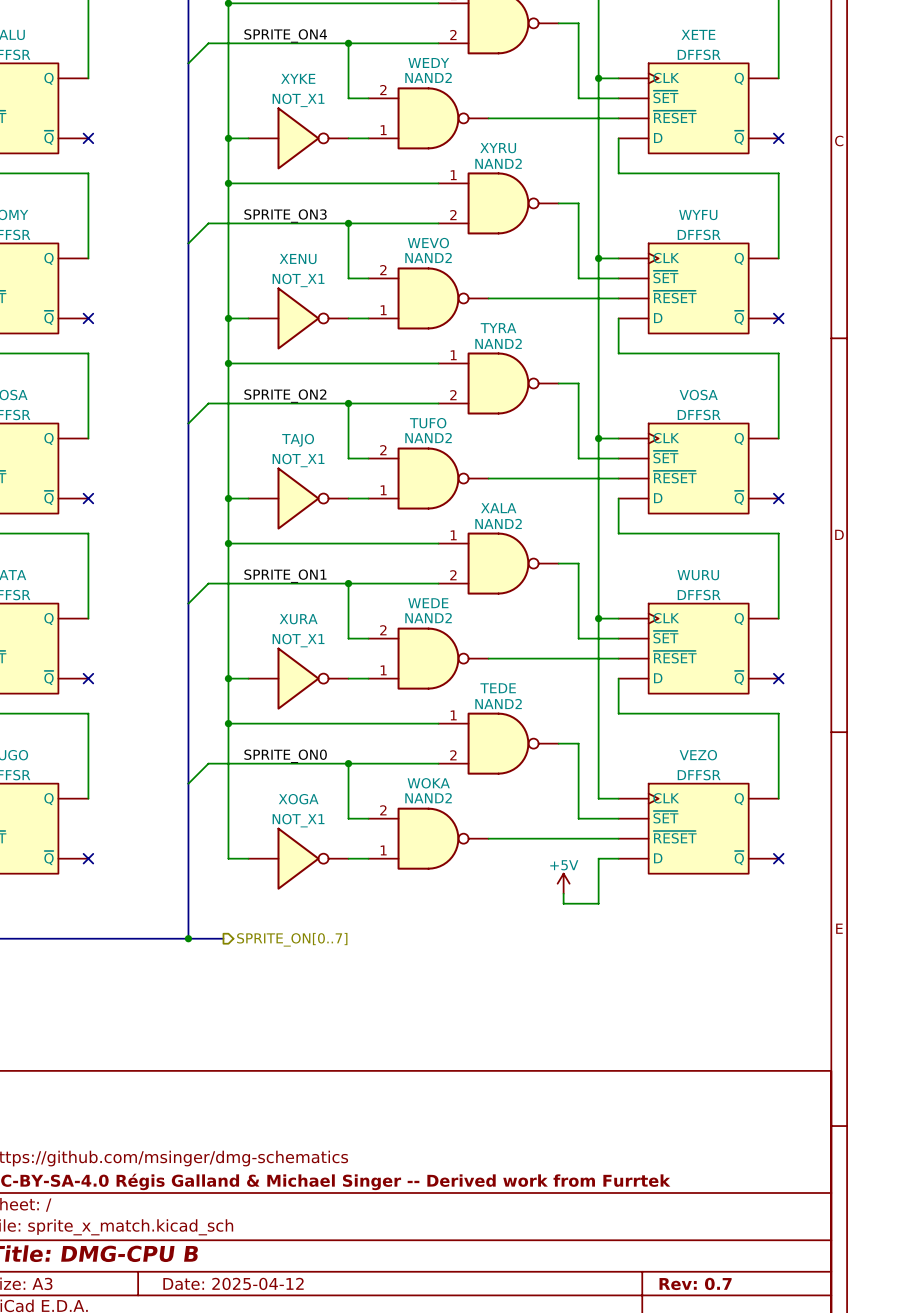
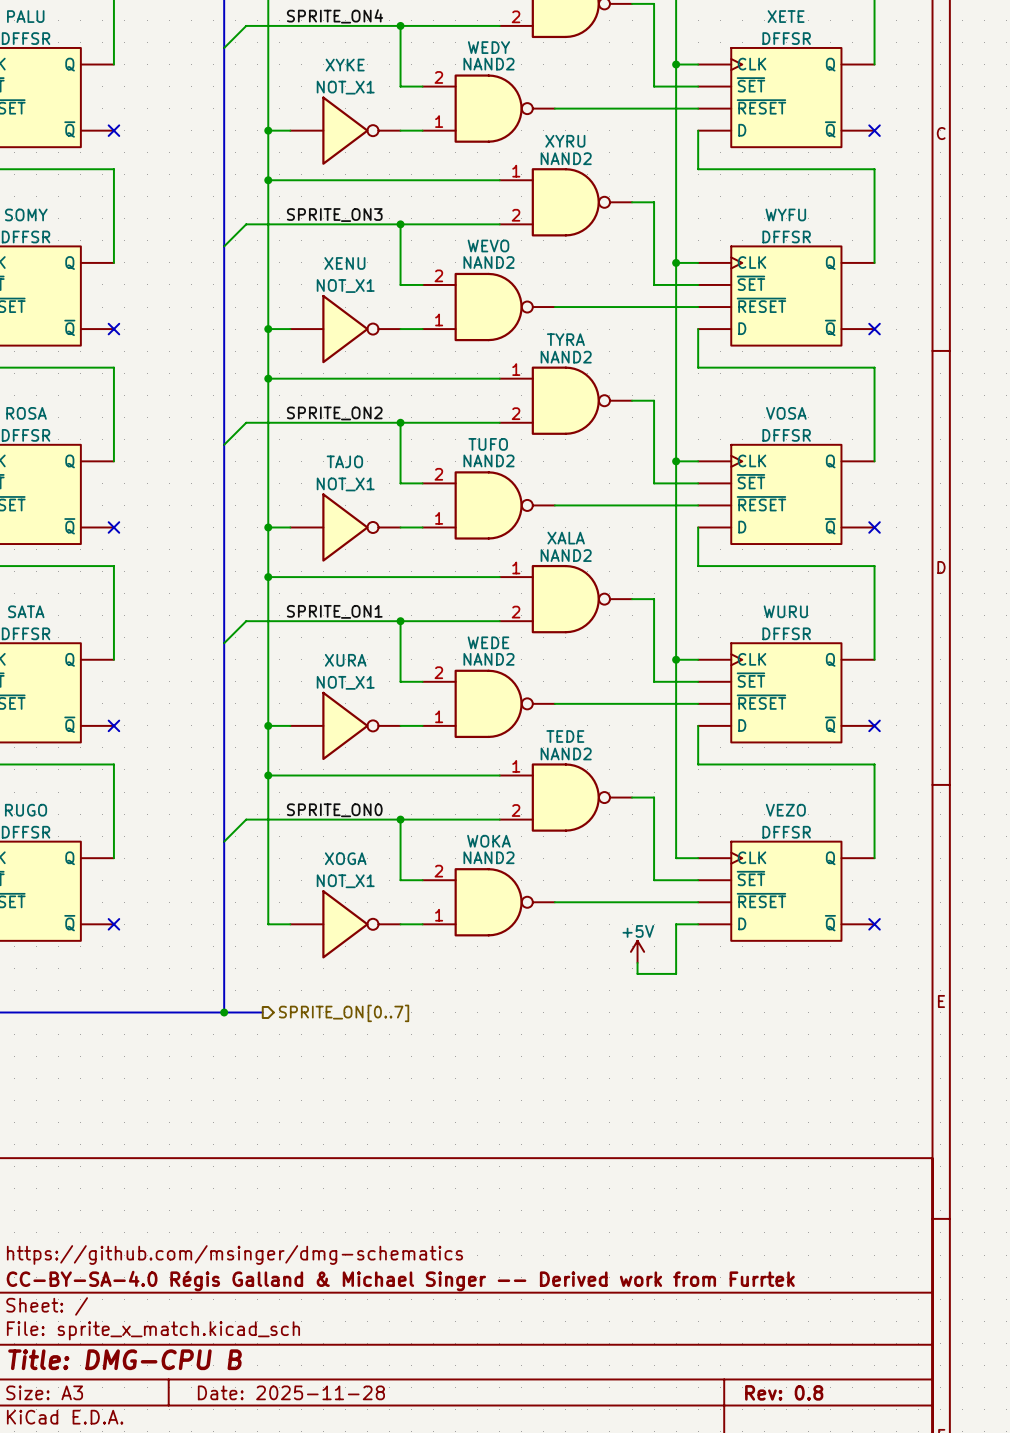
title block: Date: 2025-04-12 (233, 1283) -> Date: 2025-11-28 (291, 1392)
title block: Rev: 0.7 (695, 1283) -> Rev: 0.8 (784, 1392)

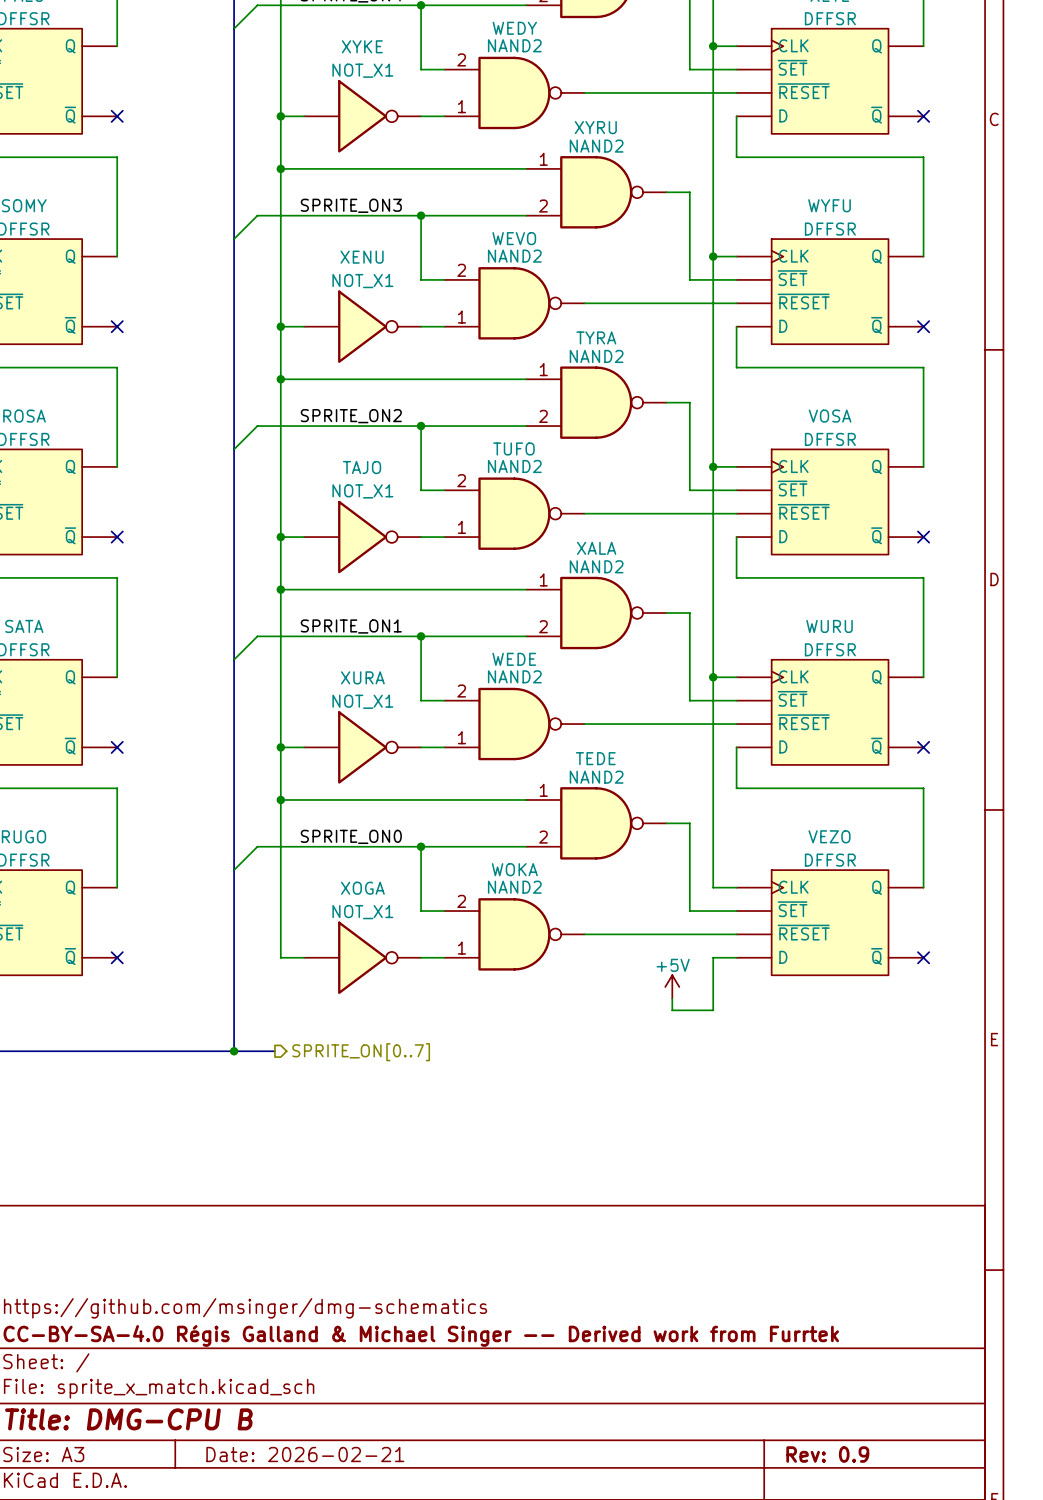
title block: Date: 2025-11-28 (291, 1392) -> Date: 2026-02-21 (305, 1454)
title block: Rev: 0.8 (784, 1392) -> Rev: 0.9 (827, 1454)

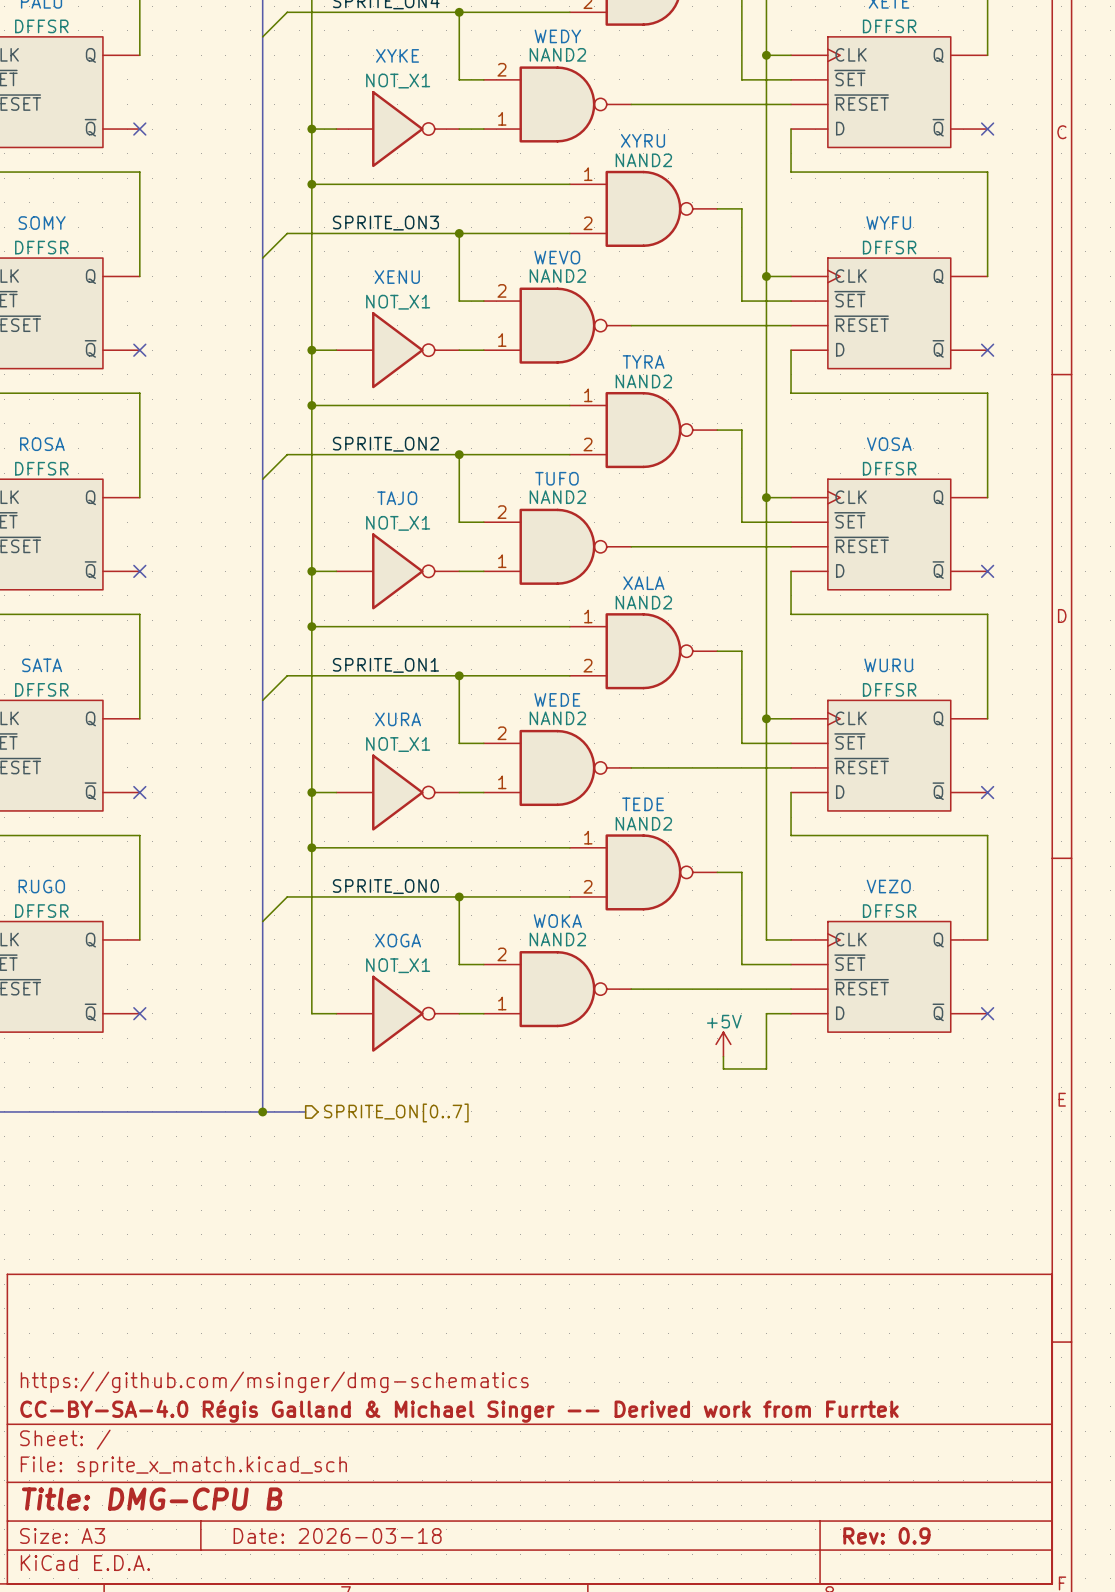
title block: Date: 2026-02-21 (305, 1454) -> Date: 2026-03-18 (337, 1535)

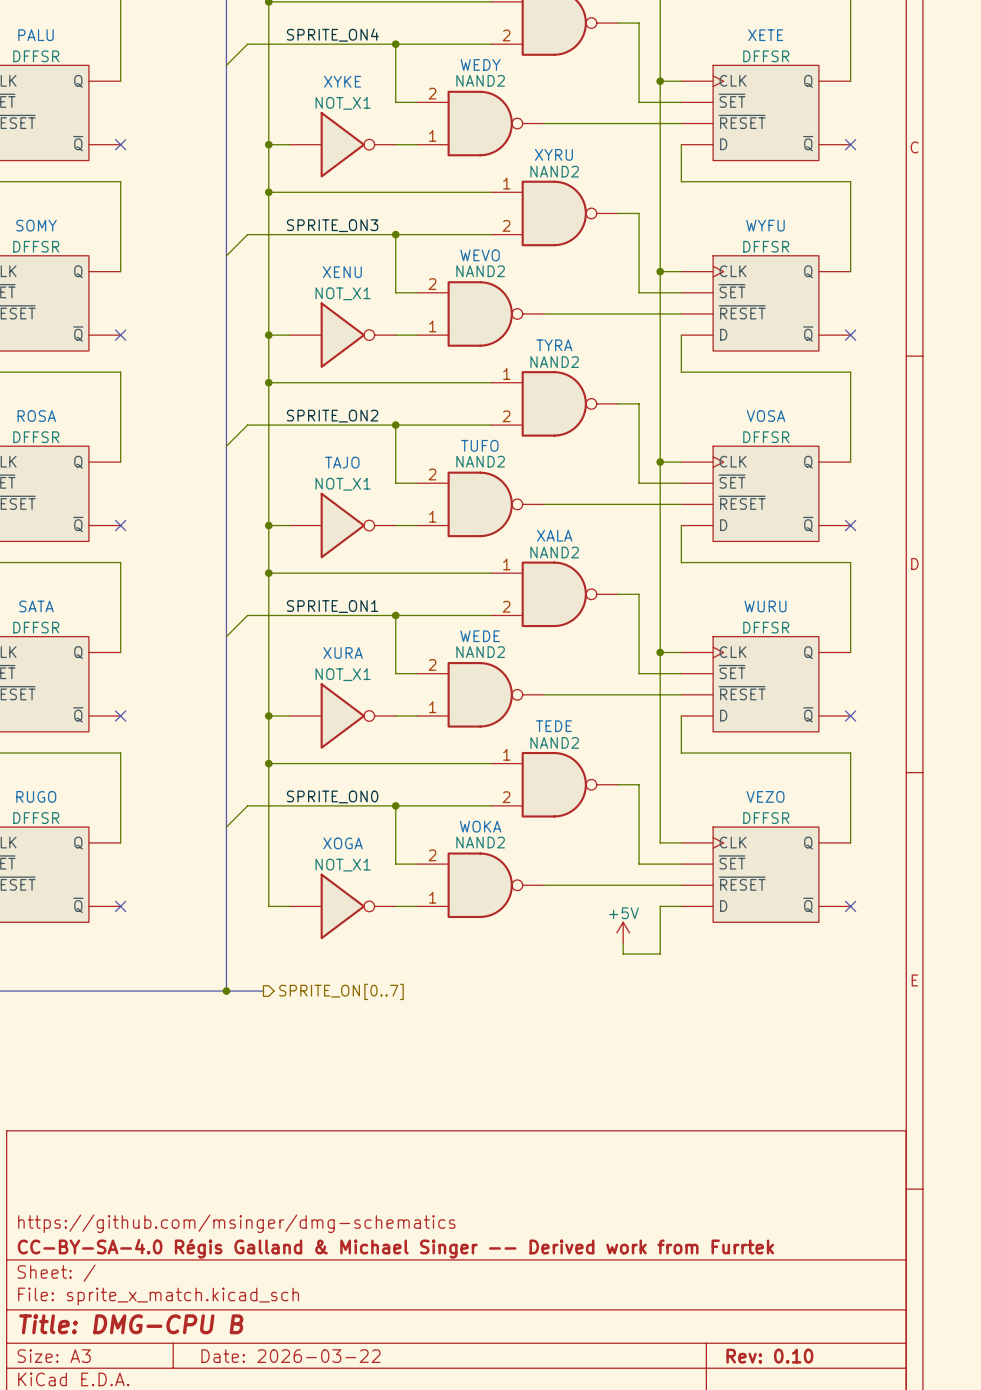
title block: Date: 2026-03-18 (337, 1535) -> Date: 2026-03-22 (290, 1356)
title block: Rev: 0.9 (886, 1535) -> Rev: 0.10 (769, 1356)

